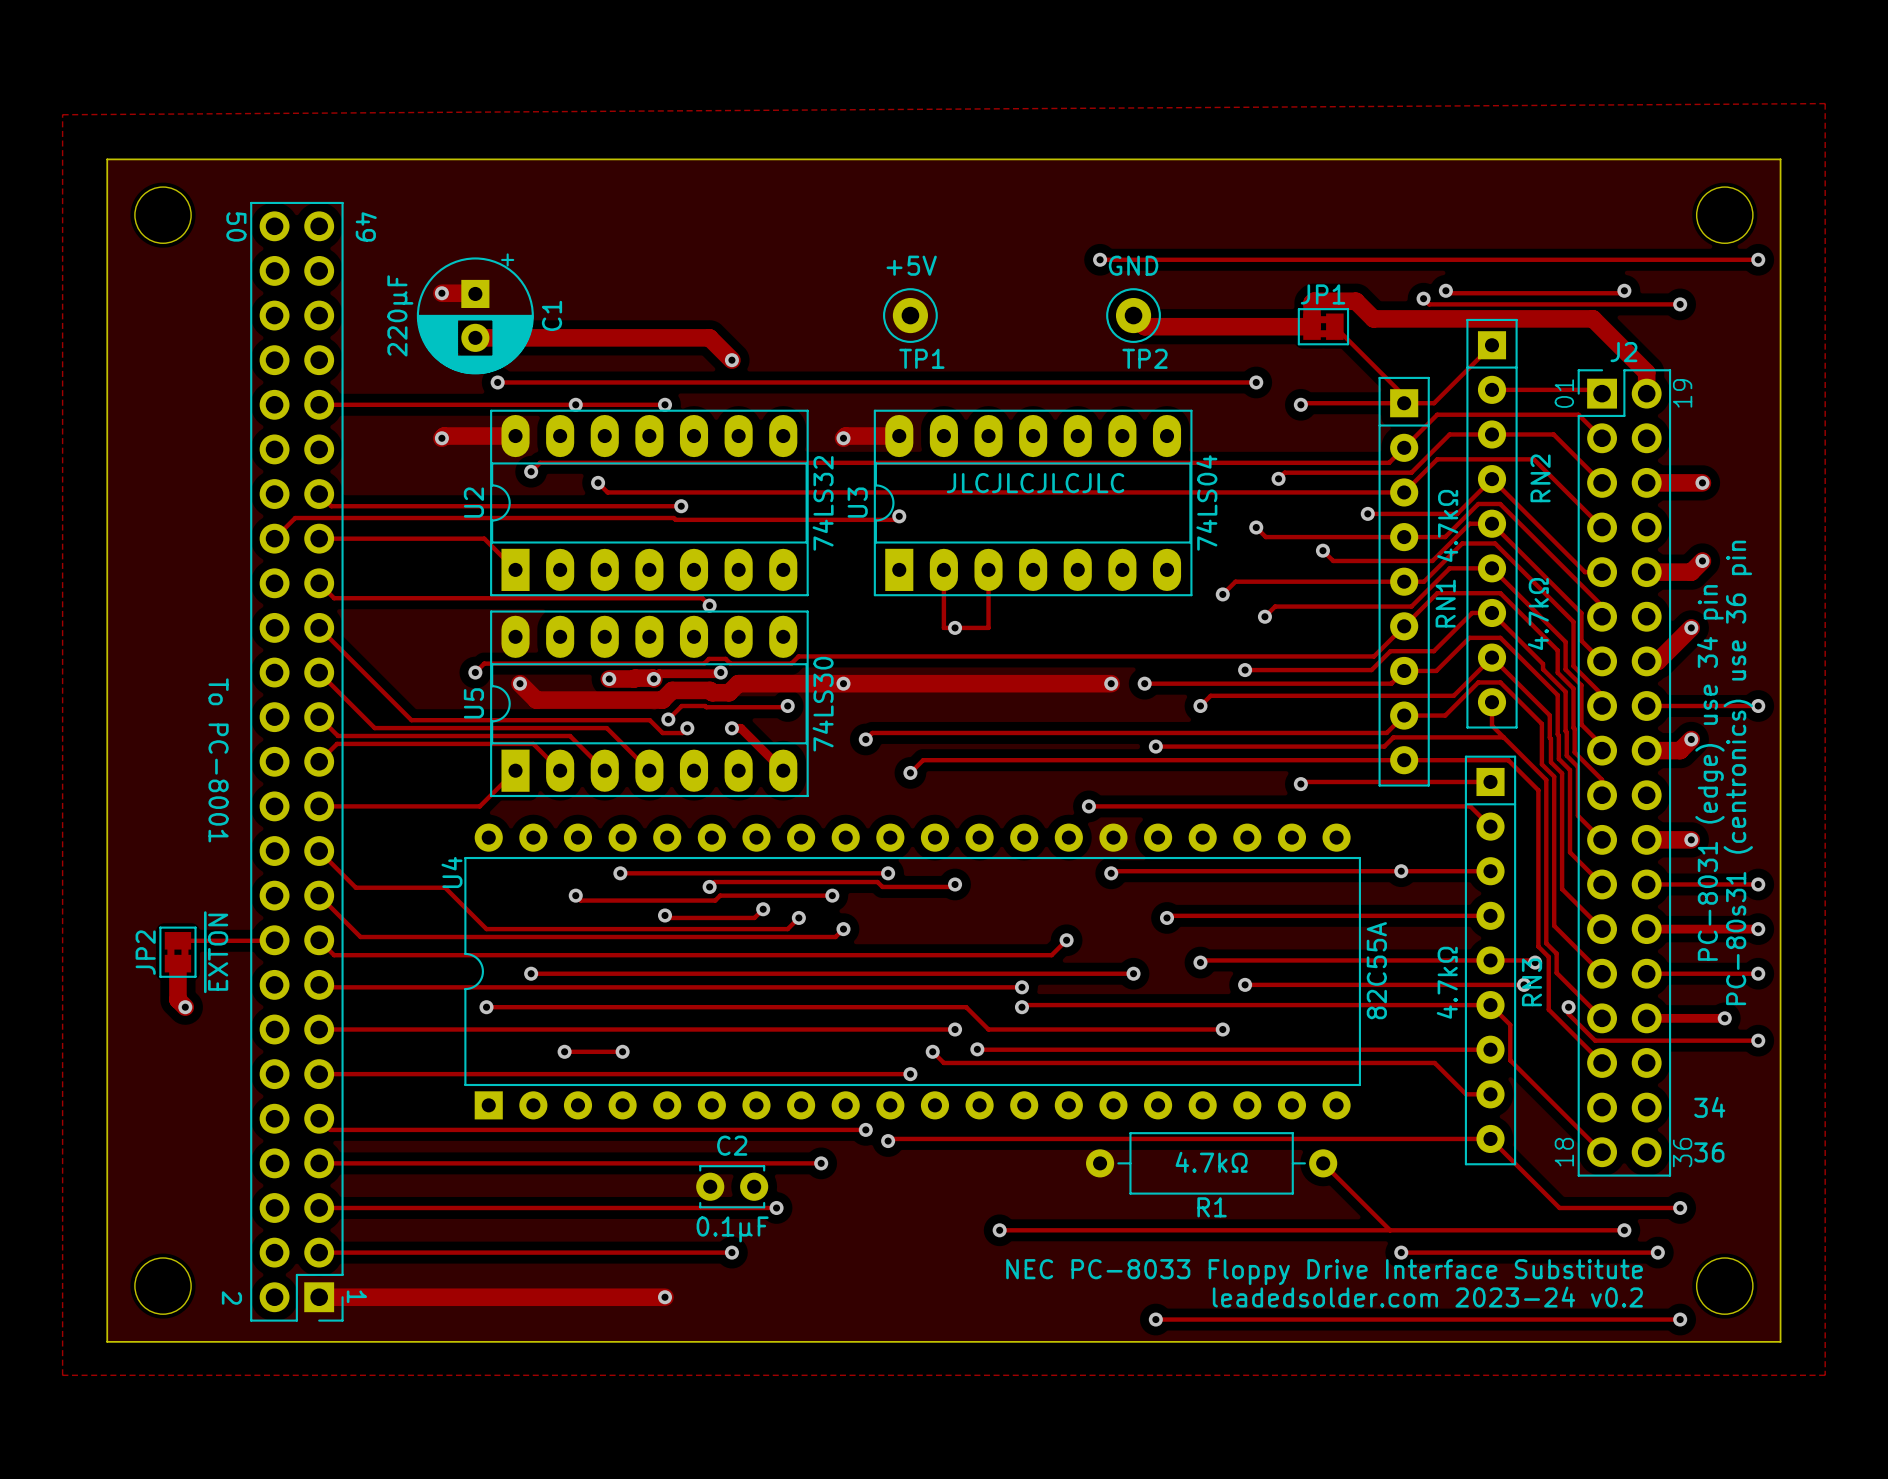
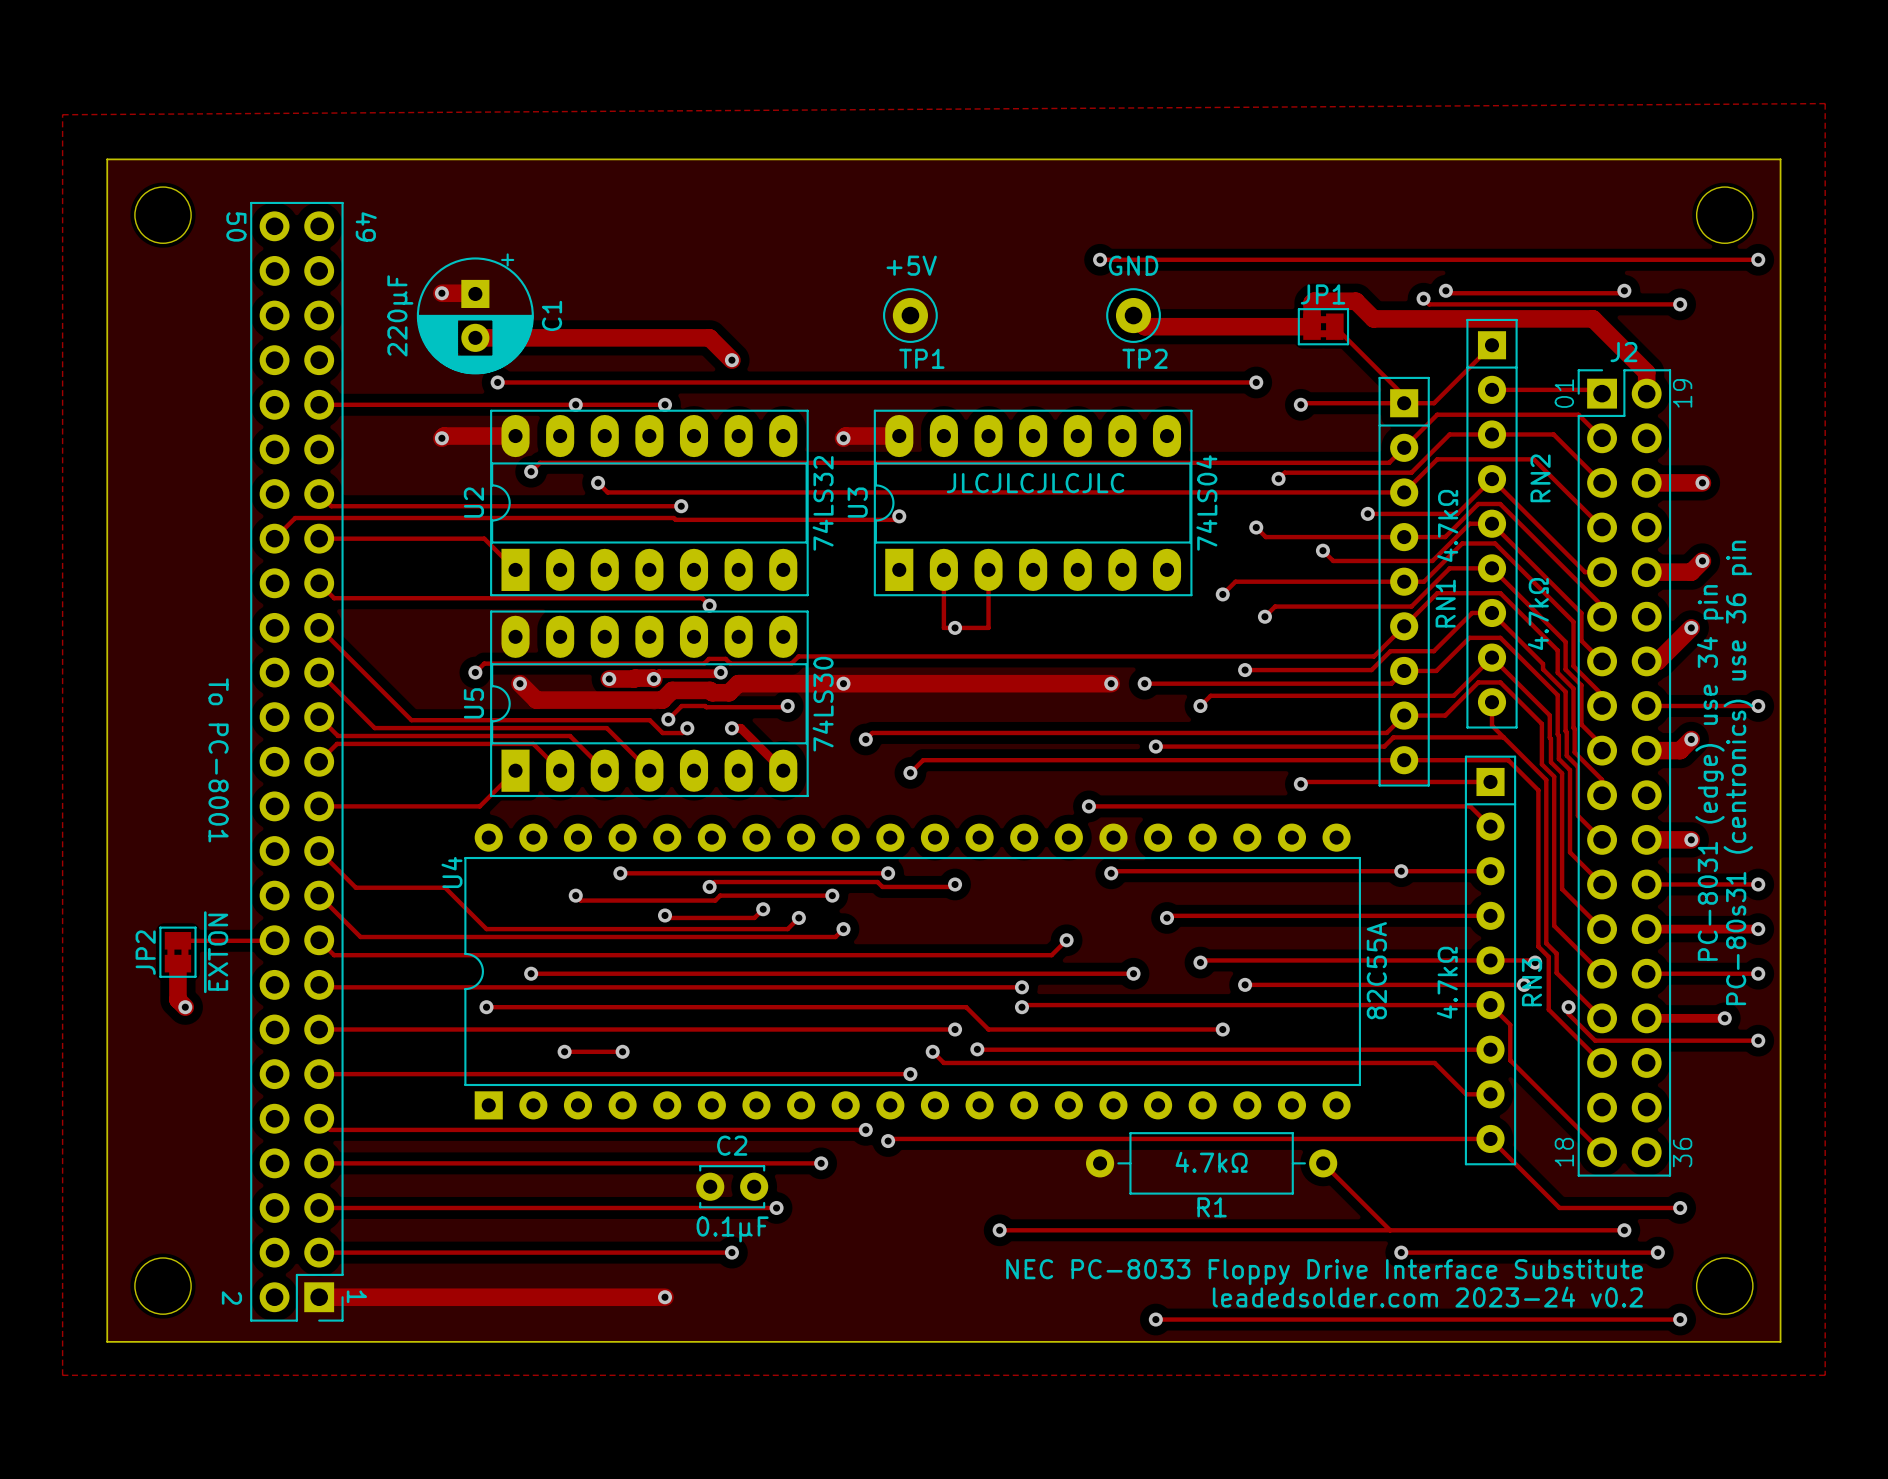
text: 34 (1709, 1107) -> none
text: 36 (1709, 1152) -> none

